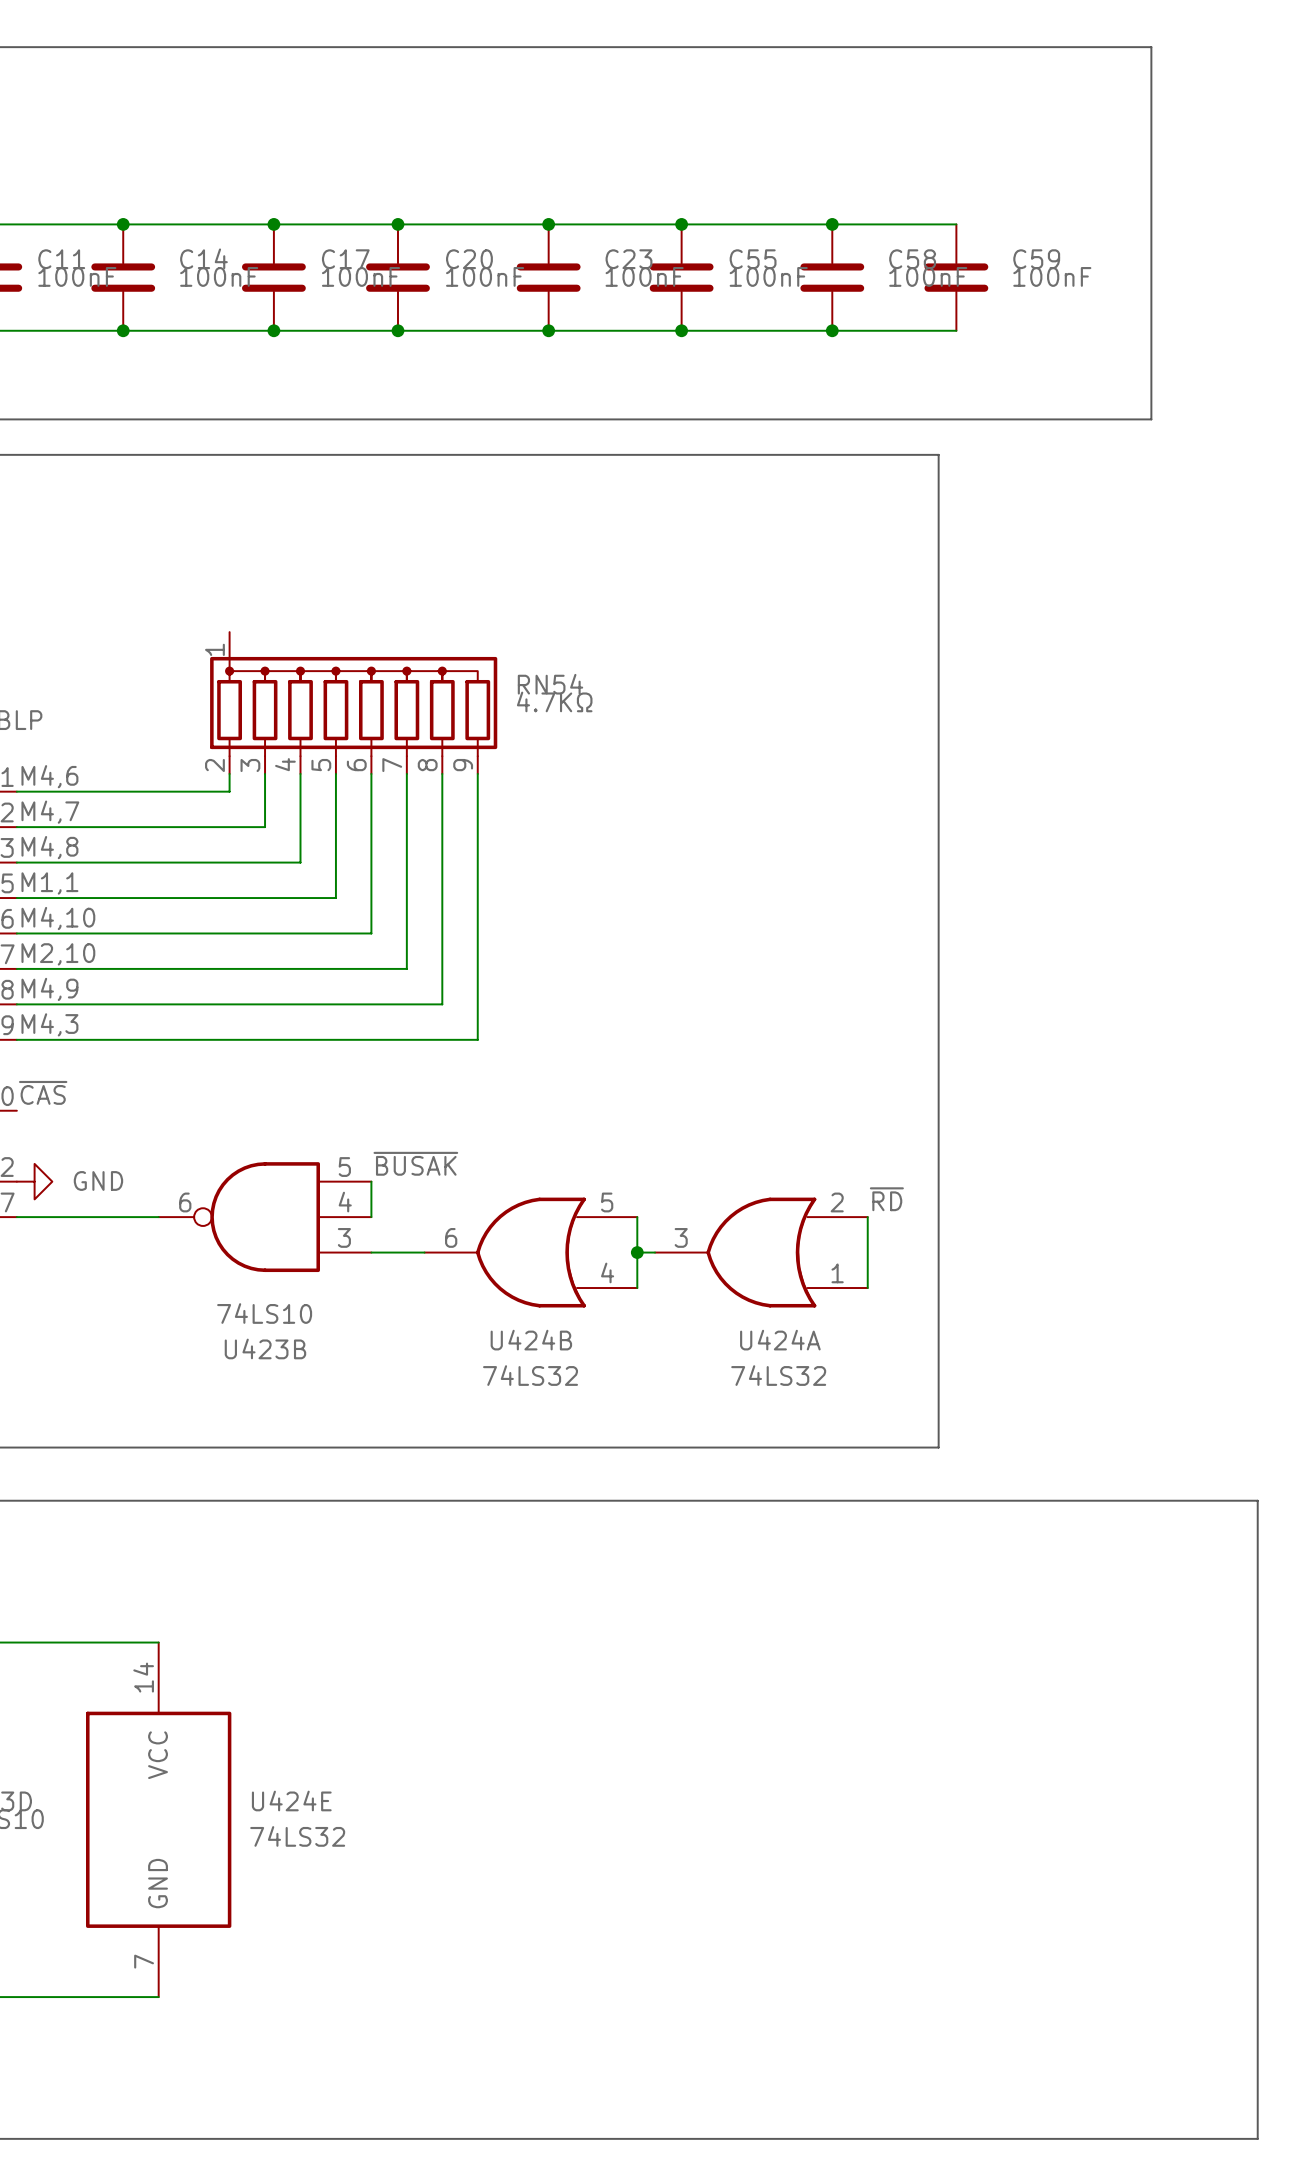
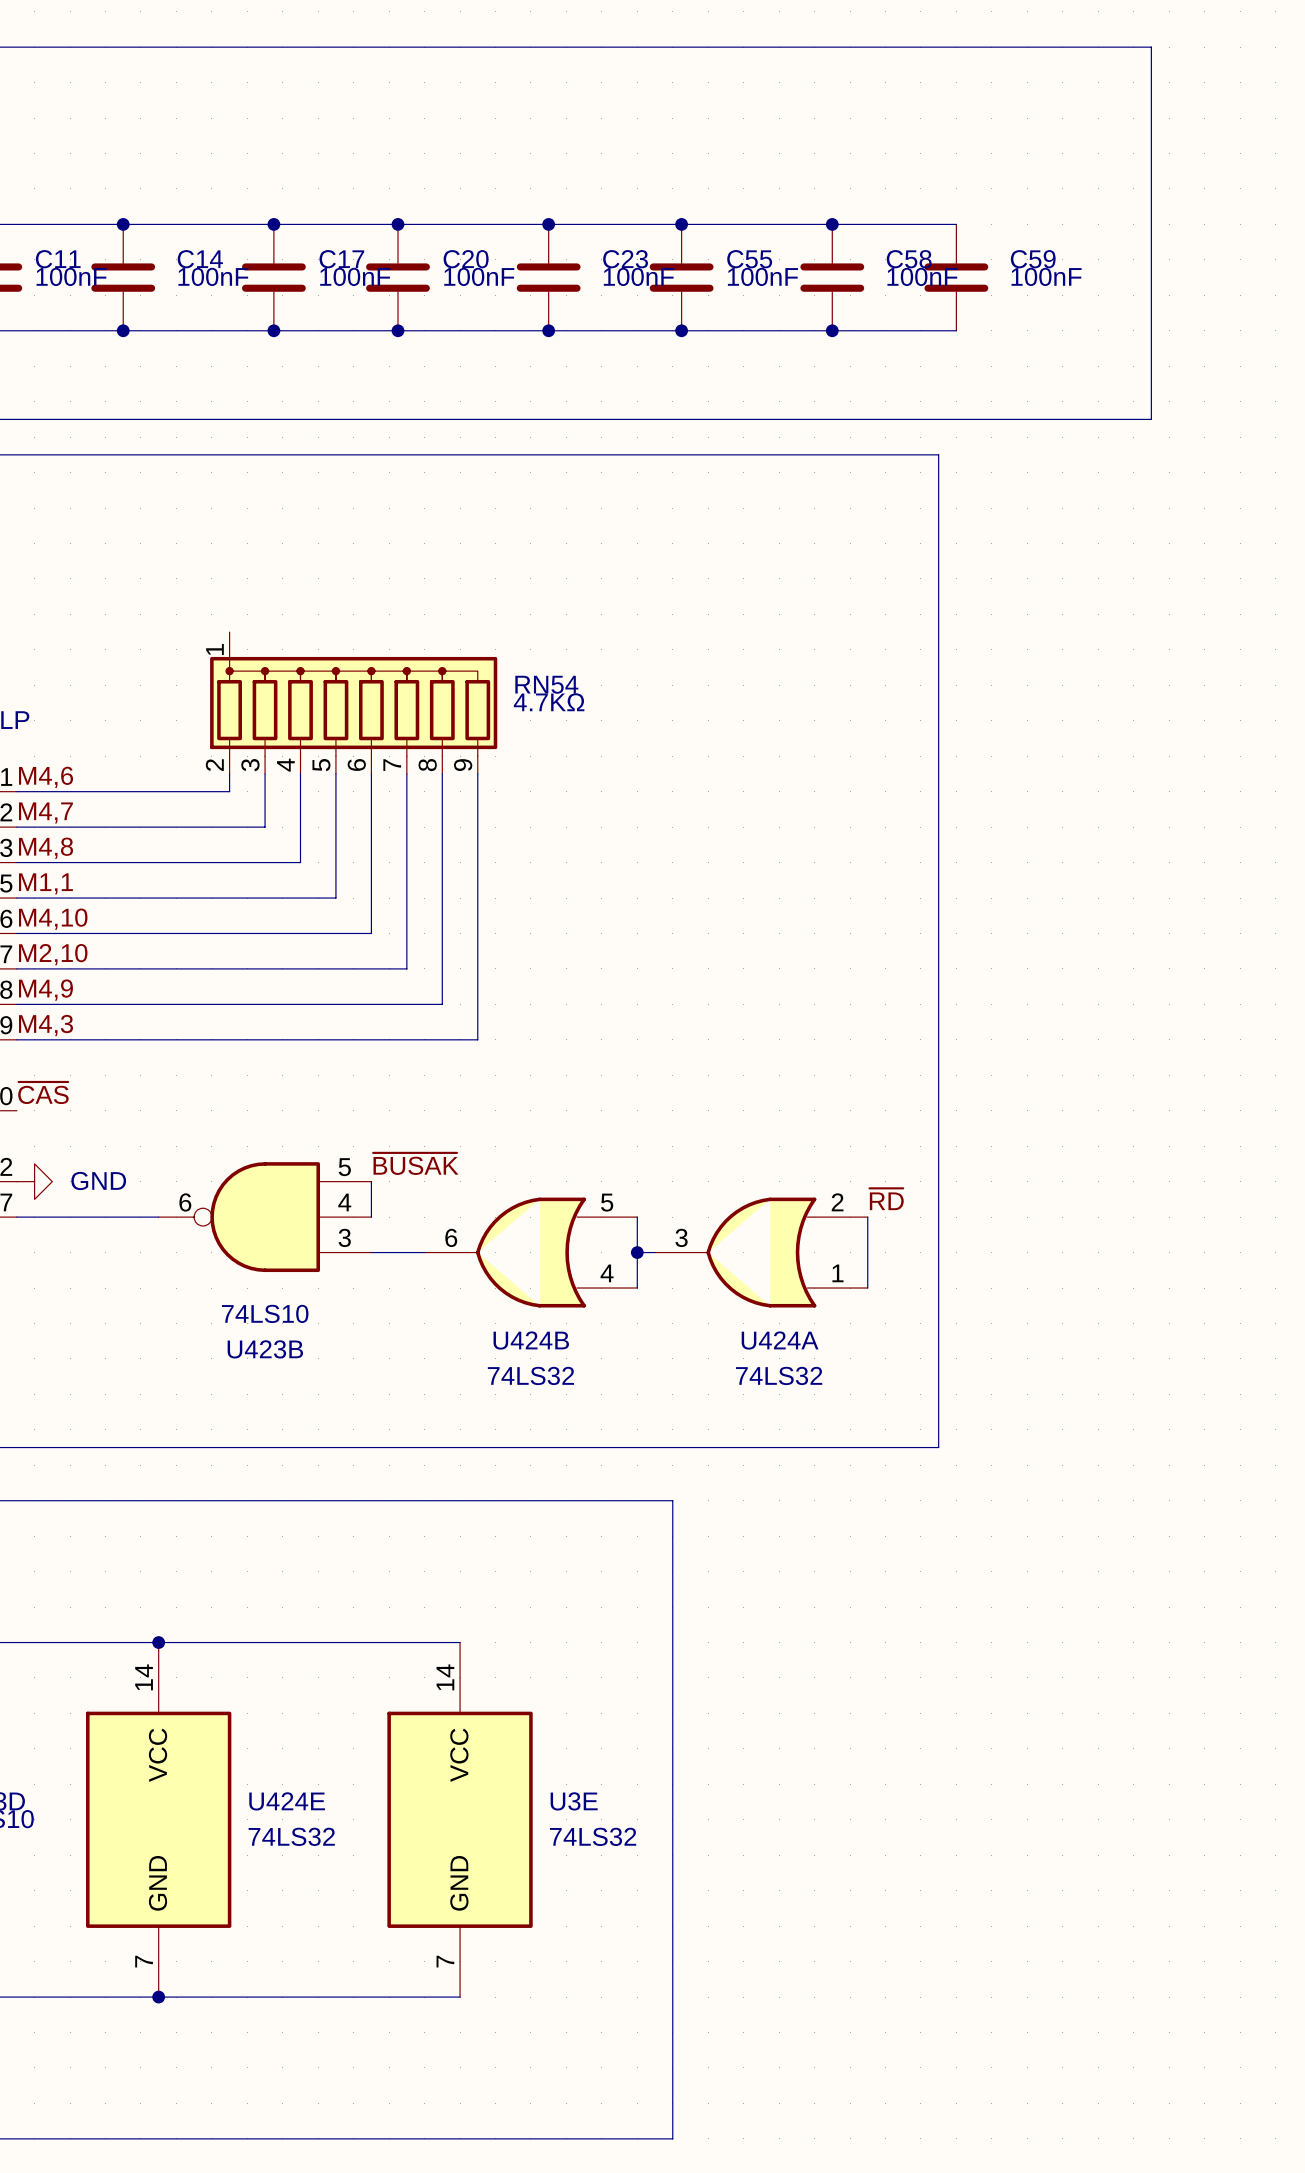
line: (672, 1500) (1257, 1500) (1257, 2138) (672, 2138) -> (672, 1500) (672, 2138)
wire: none -> (158, 1642) (460, 1642)
junction: none -> (158, 1642)
U3E: none -> 74LS32 (460, 1819)
wire: none -> (158, 1997) (460, 1997)
junction: none -> (158, 1997)

